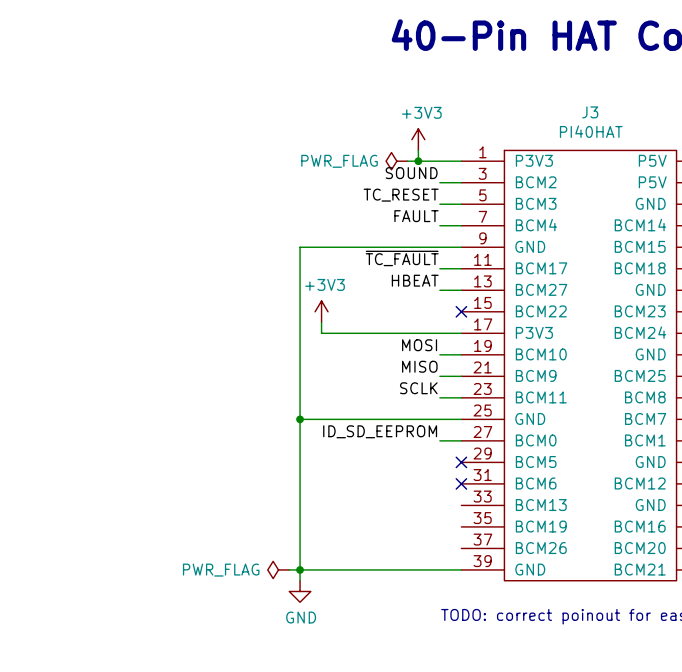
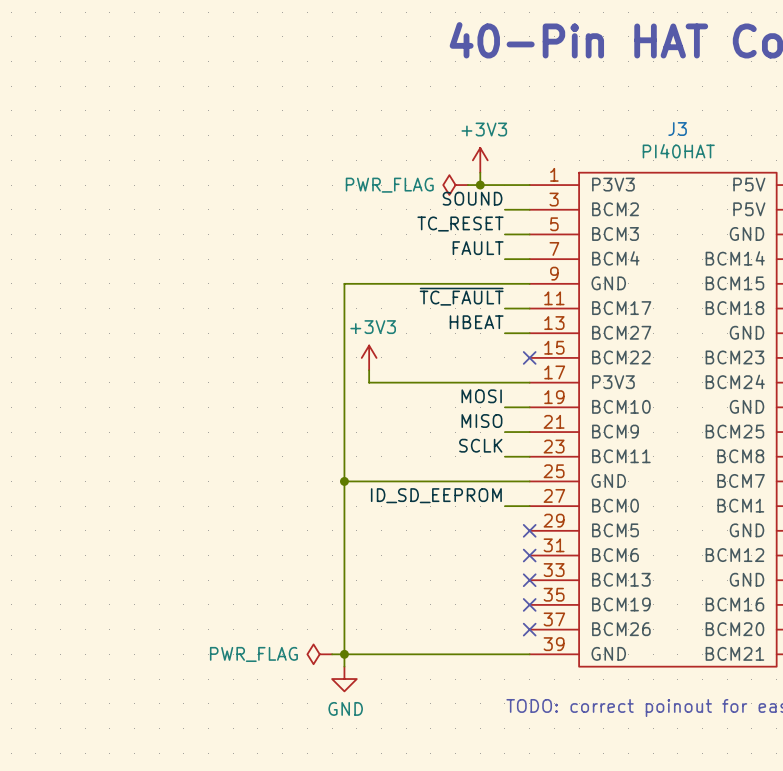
no-connect mark: none -> (529, 580)
no-connect mark: none -> (529, 604)
no-connect mark: none -> (529, 629)

